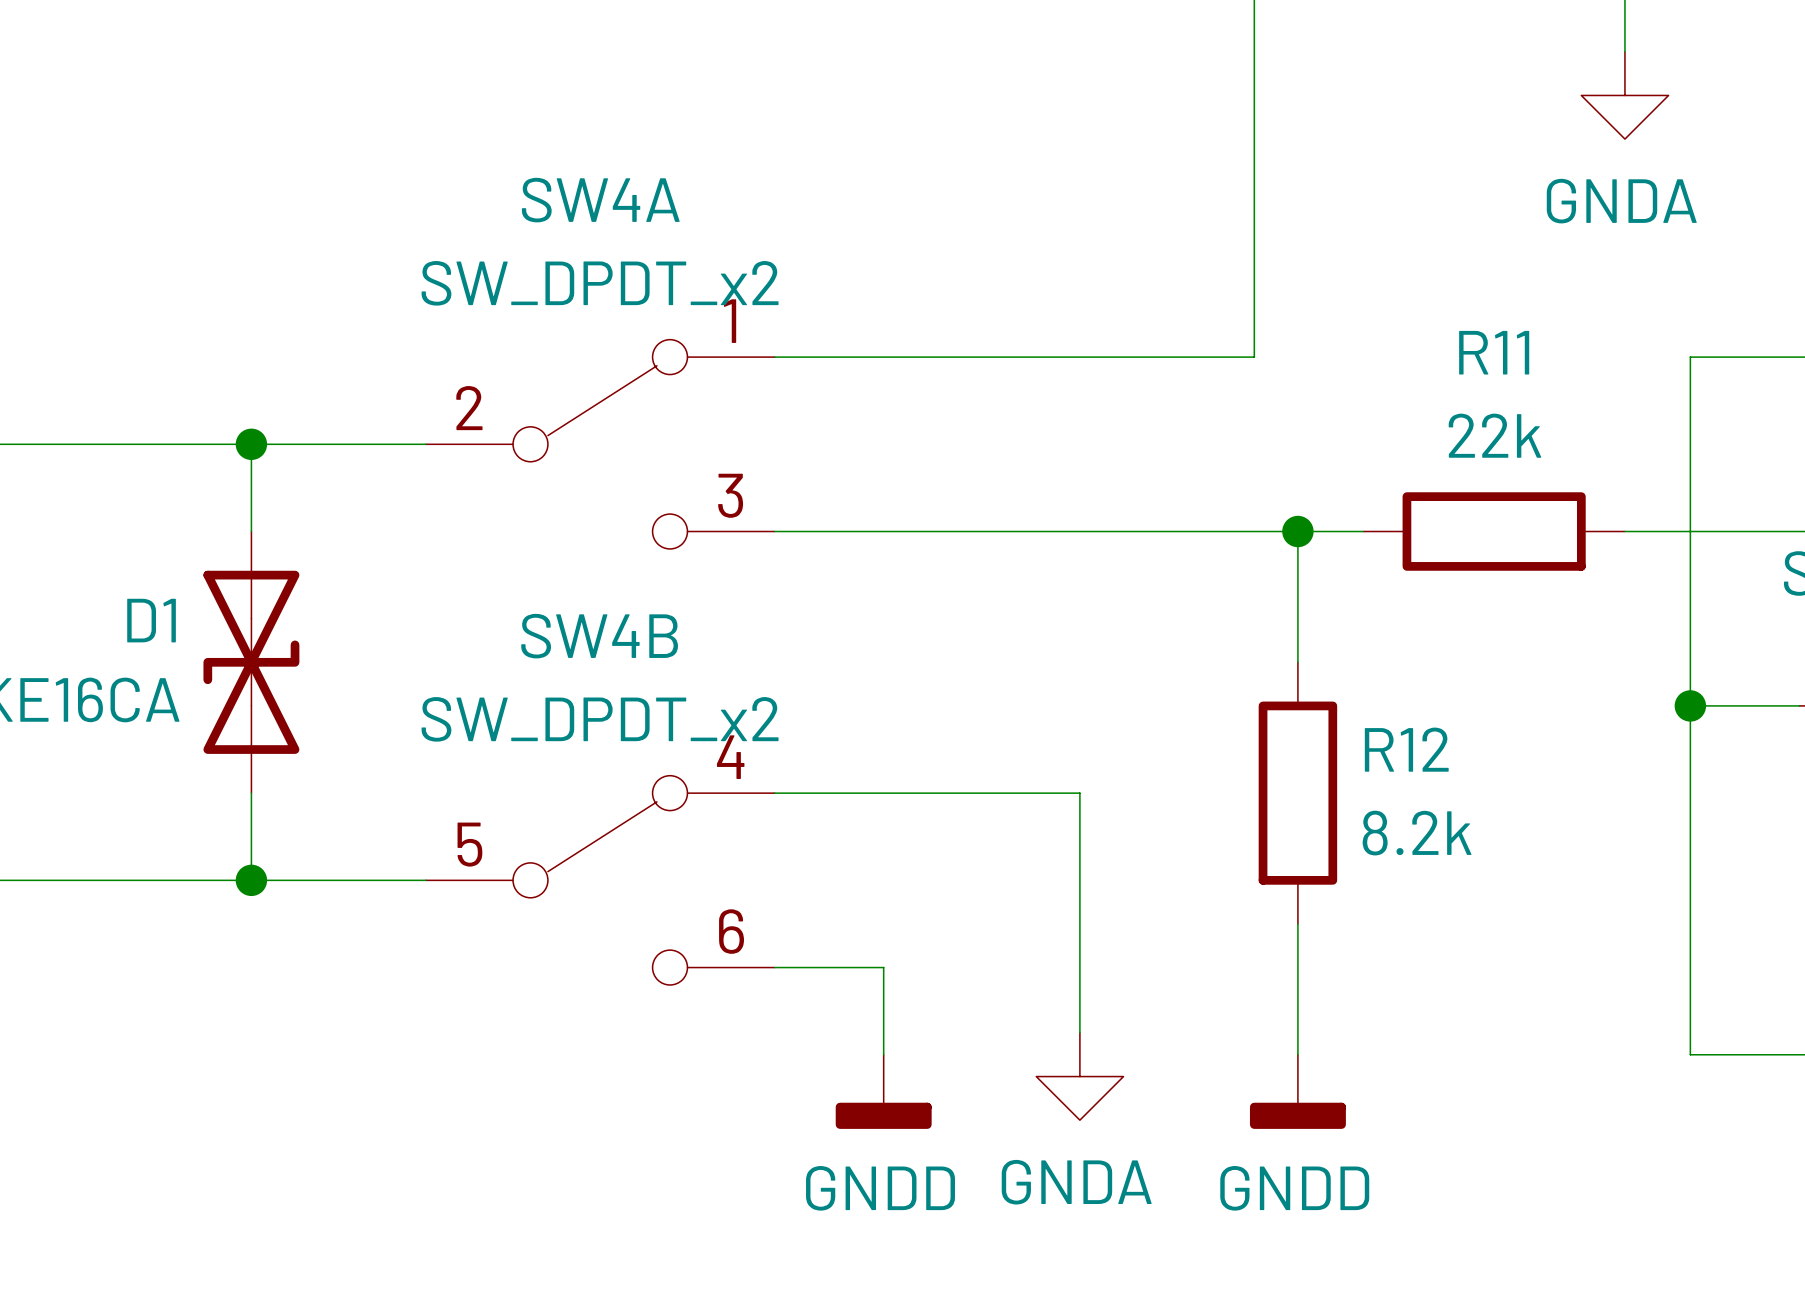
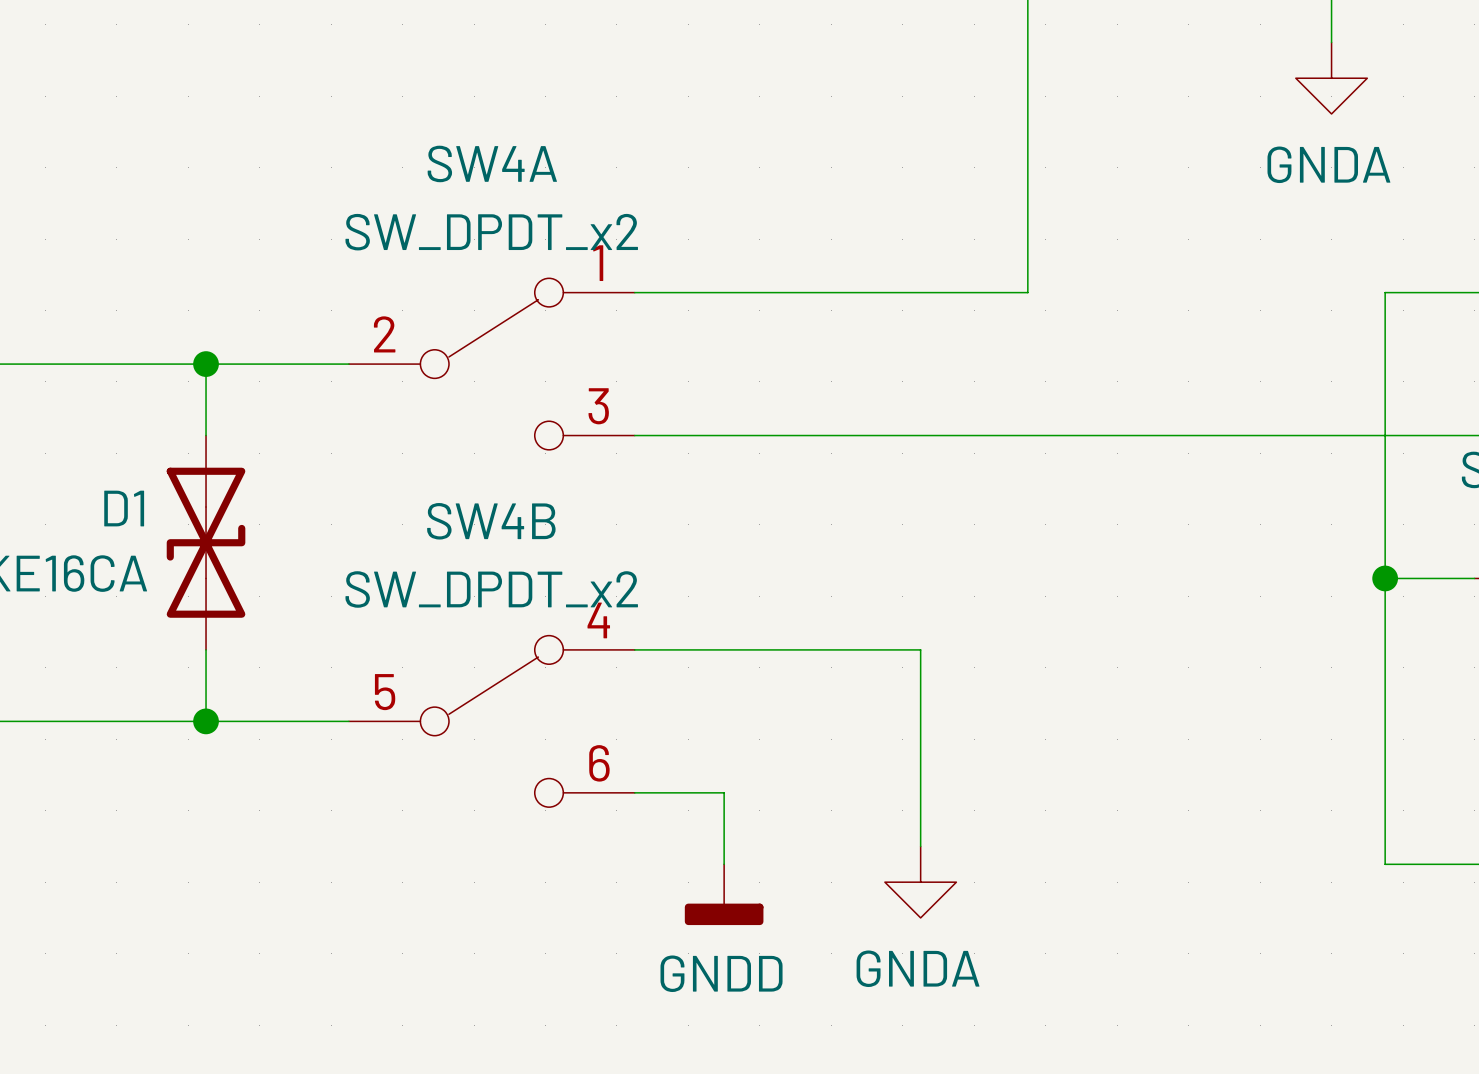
wire: (1297, 531) (1297, 662) -> none
junction: (1297, 531) -> none
wire: none -> (1117, 435) (1331, 435)
R11: 22k (1494, 531) -> none
wire: (1079, 793) (1079, 1032) -> (884, 649) (920, 649) (920, 846)
R12: 8.2k (1297, 793) -> none
wire: (1297, 923) (1297, 1054) -> none
power symbol position: GNDA (1079, 1076) -> GNDA (920, 882)
power symbol: GNDD (1297, 1091) -> none

